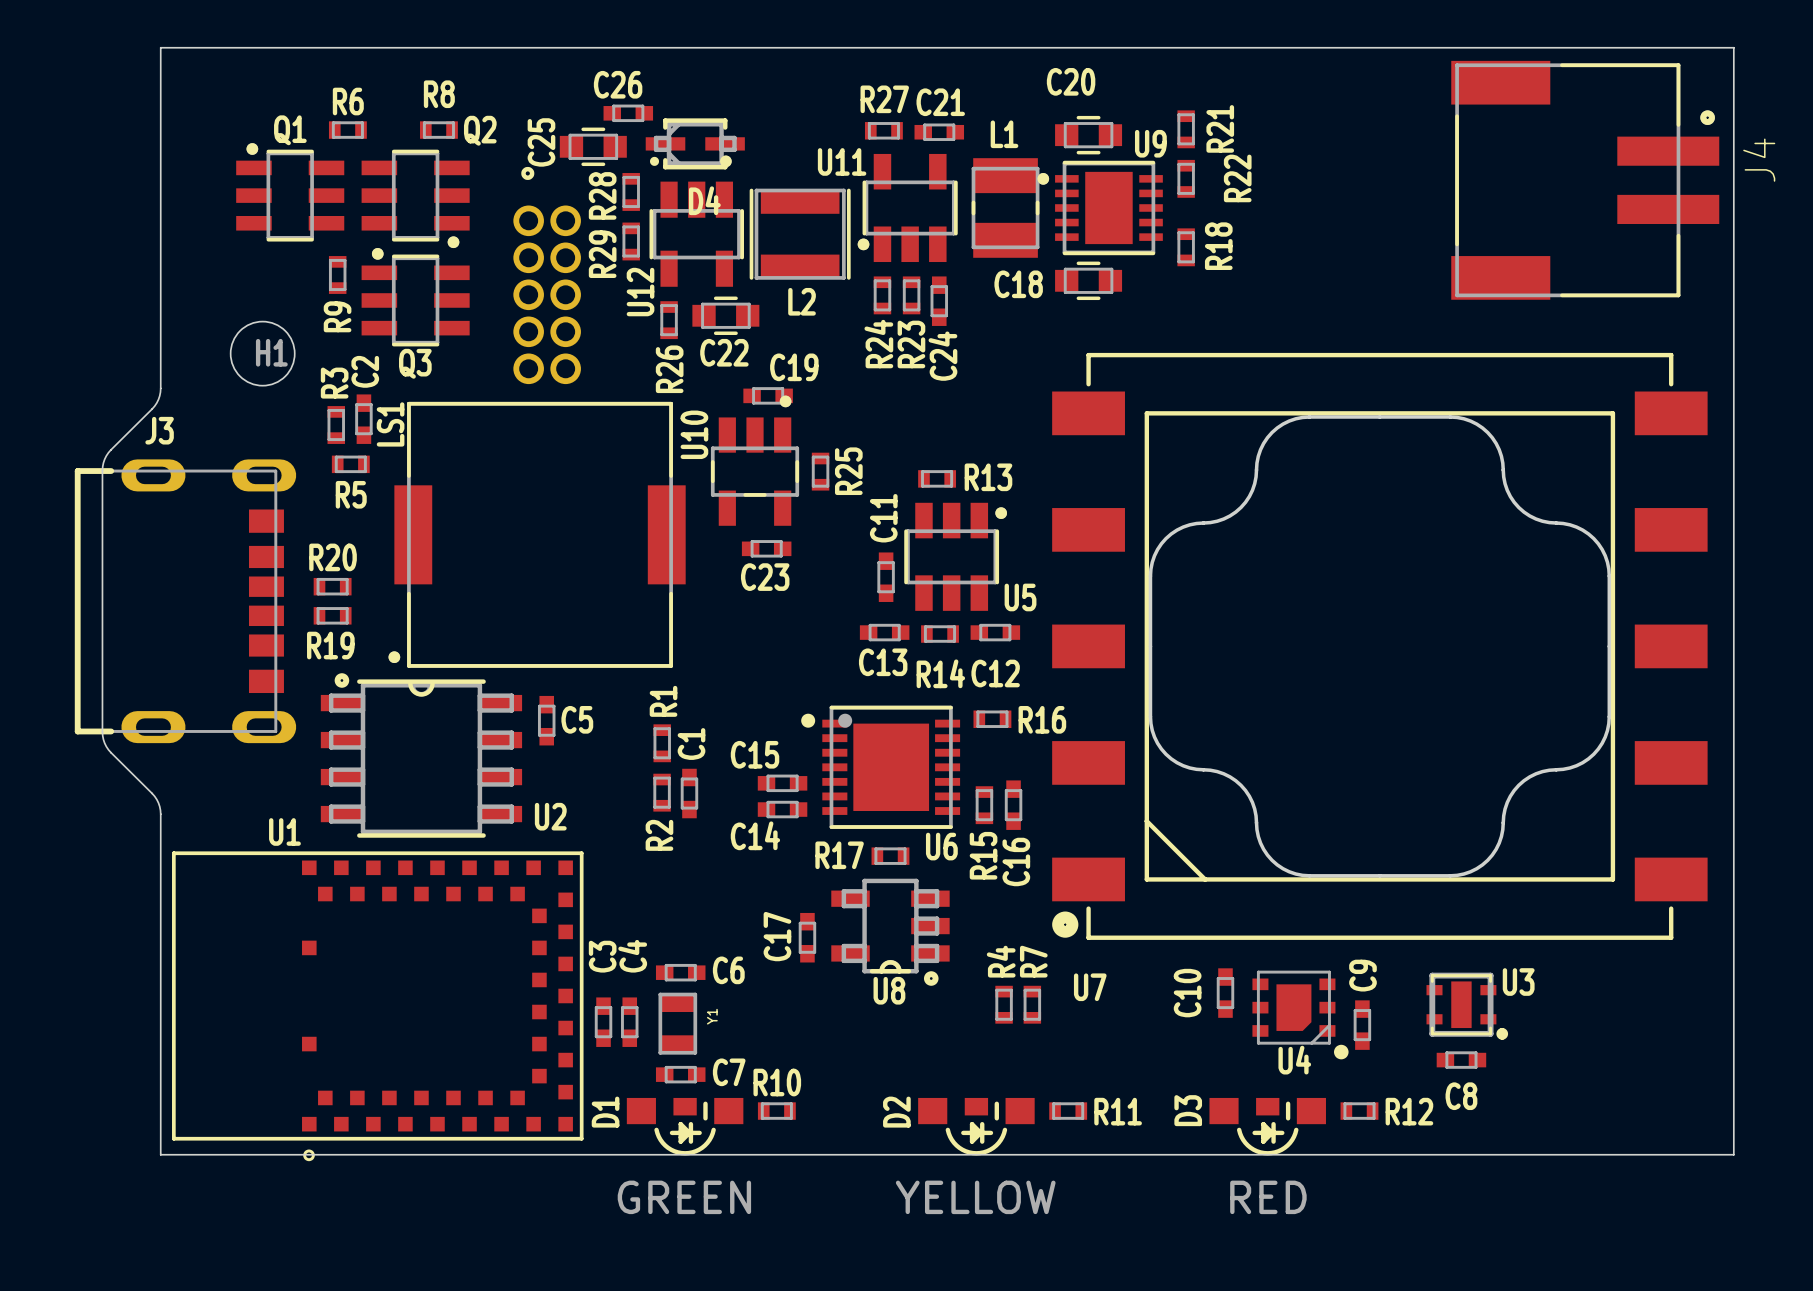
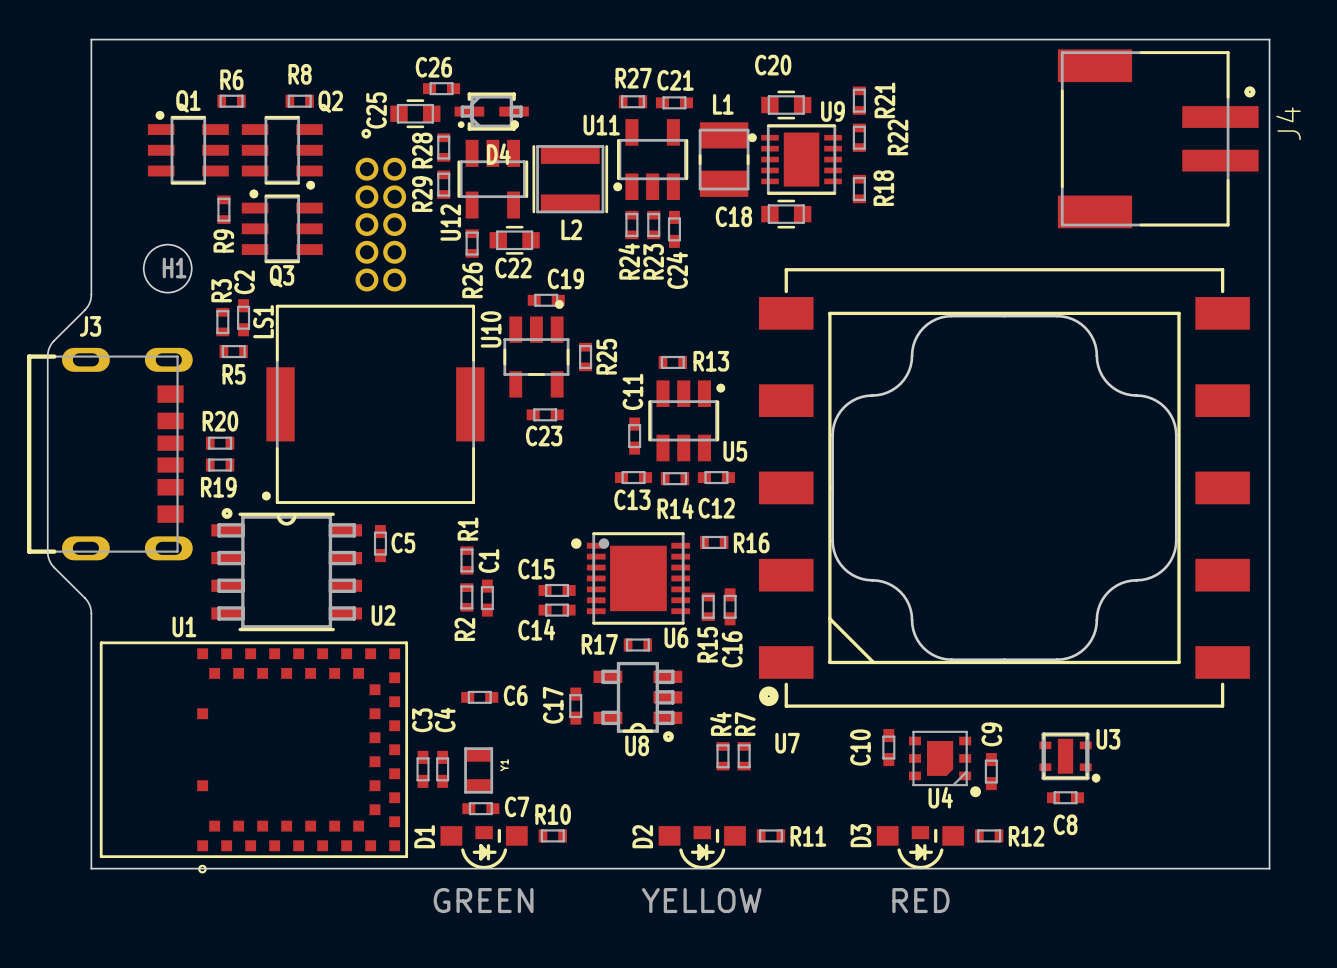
C6 position: (680, 972) -> (479, 697)

